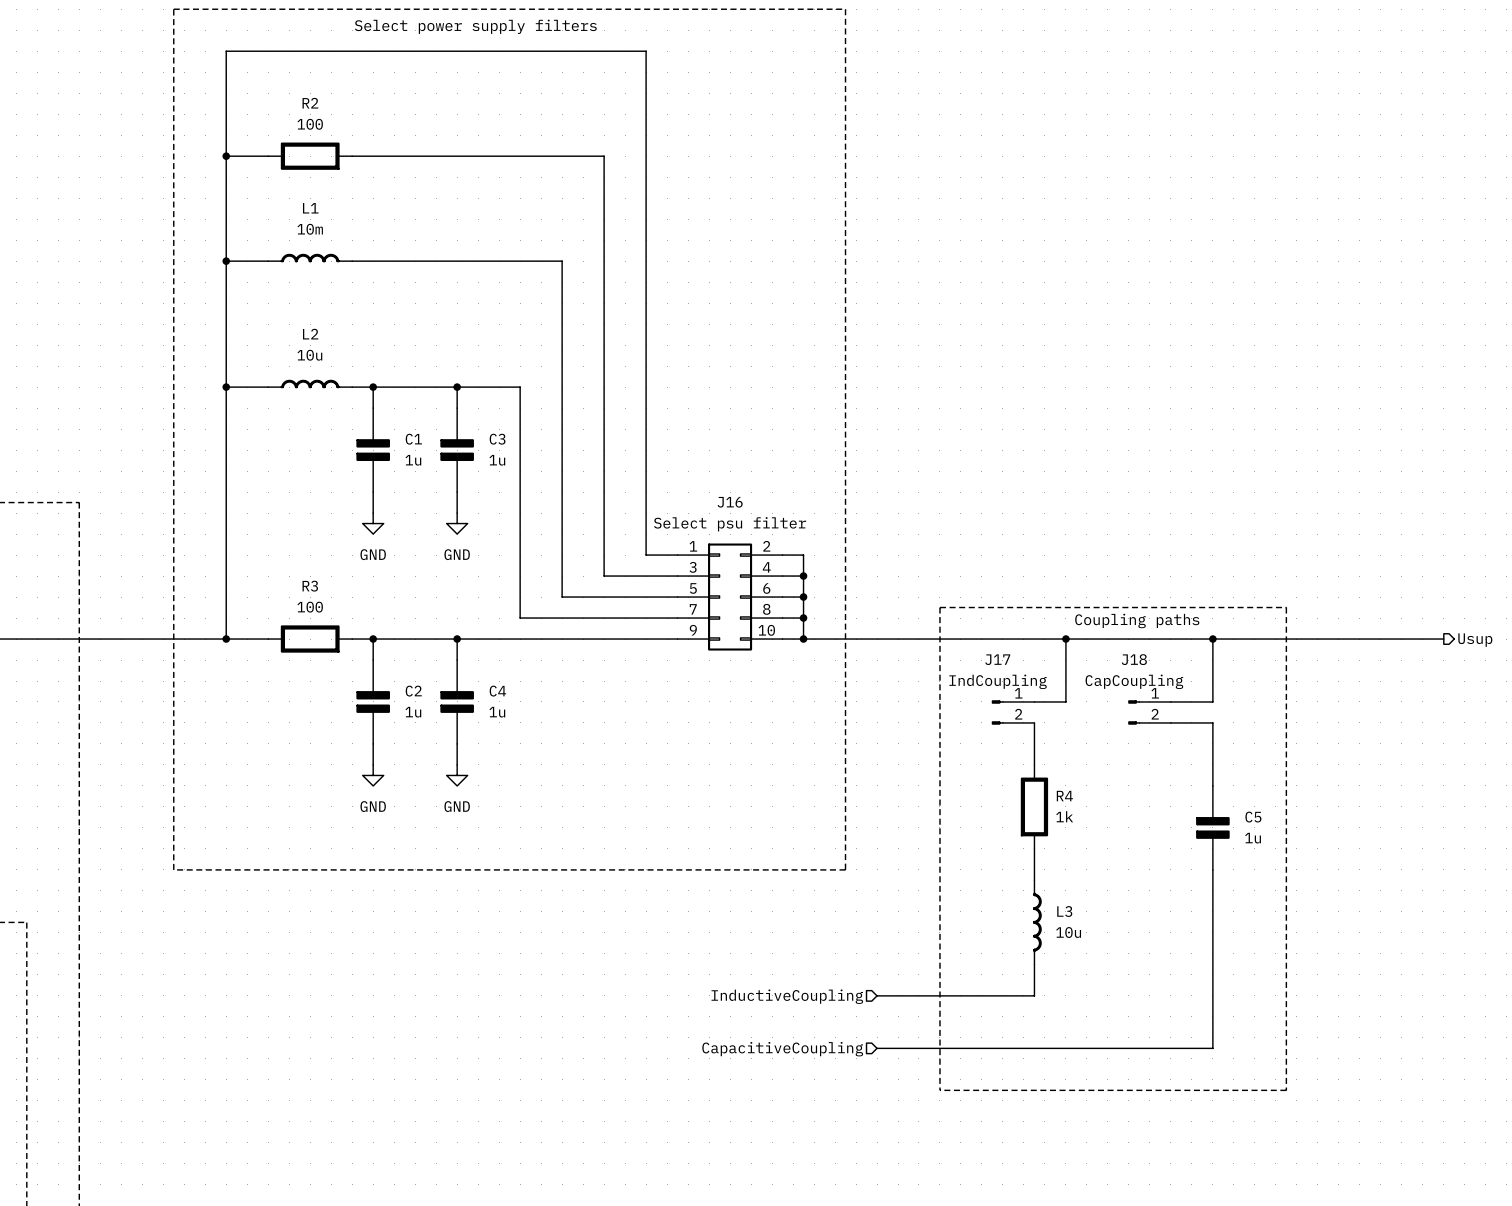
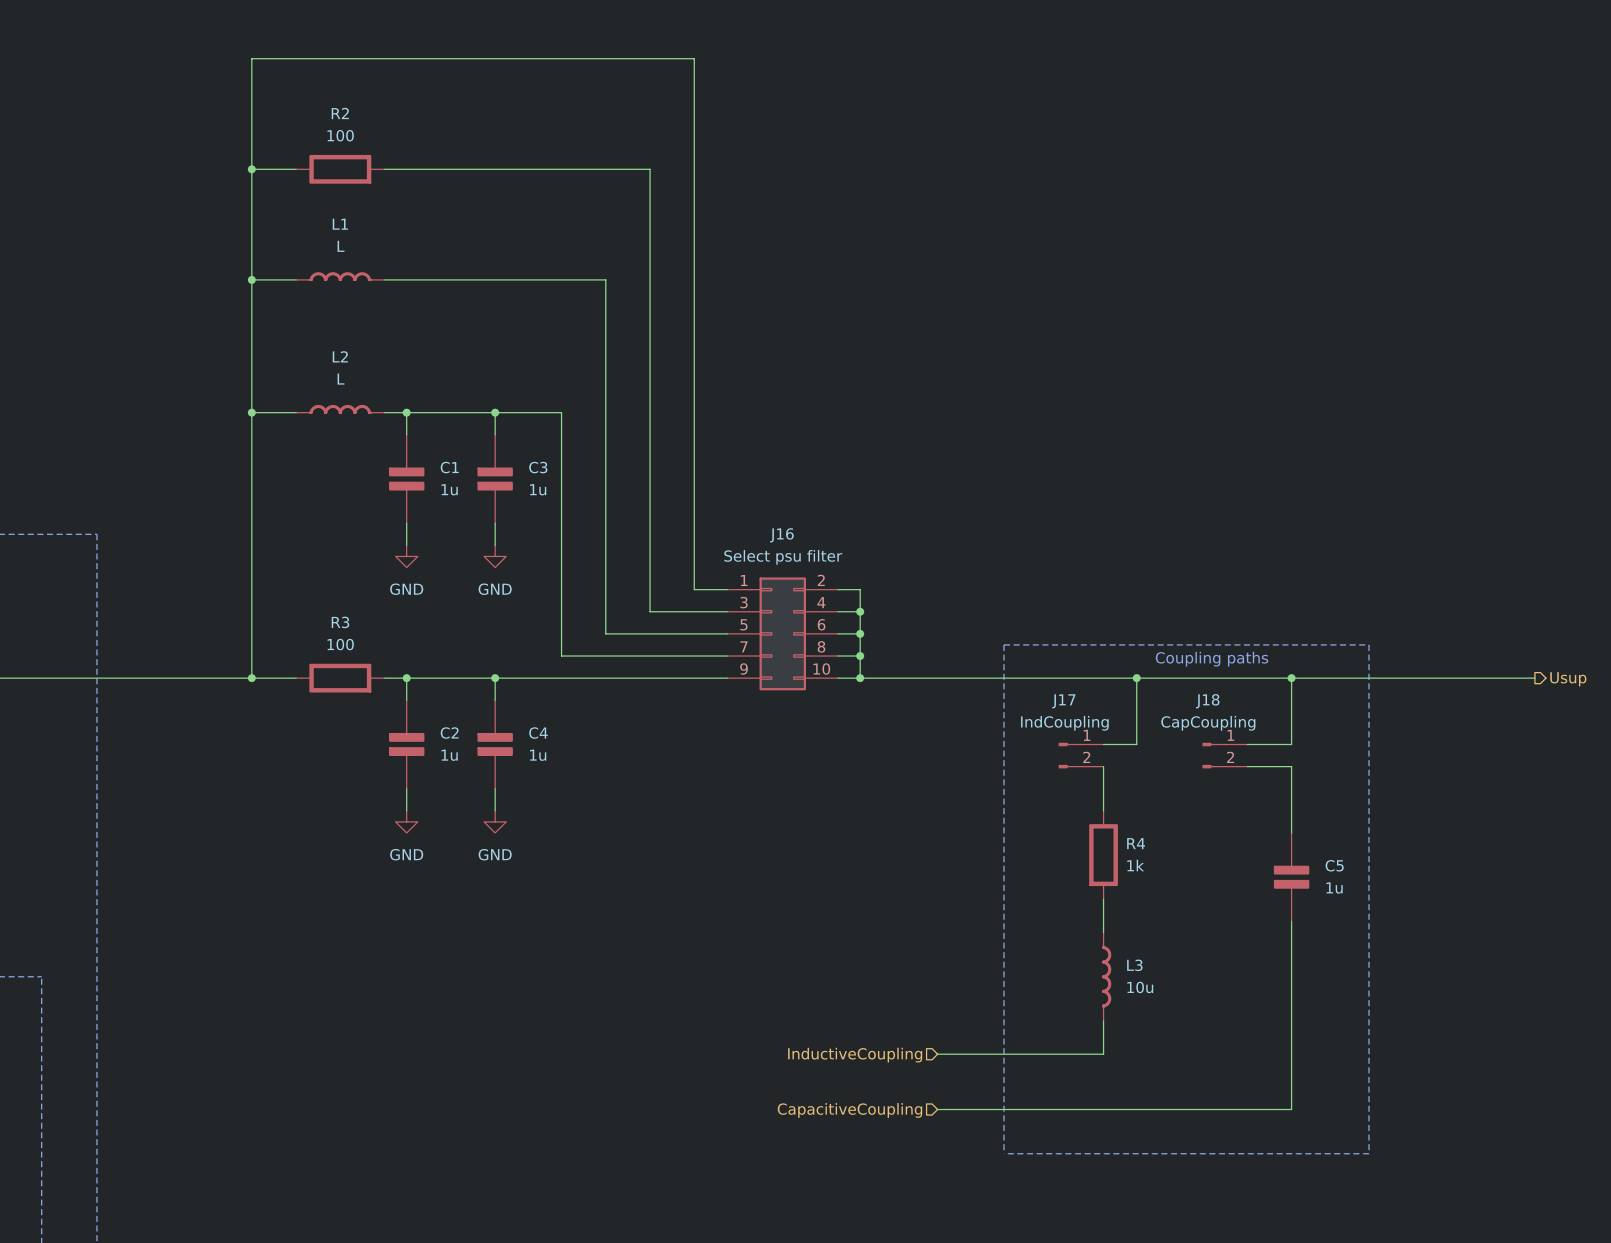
line: (173, 9) (845, 9) (845, 869) (173, 869) (173, 9) -> none
text: Select power supply filters (475, 26) -> none
L1 value: 10m (310, 229) -> L (341, 246)
L2 value: 10u (309, 355) -> L (341, 379)

